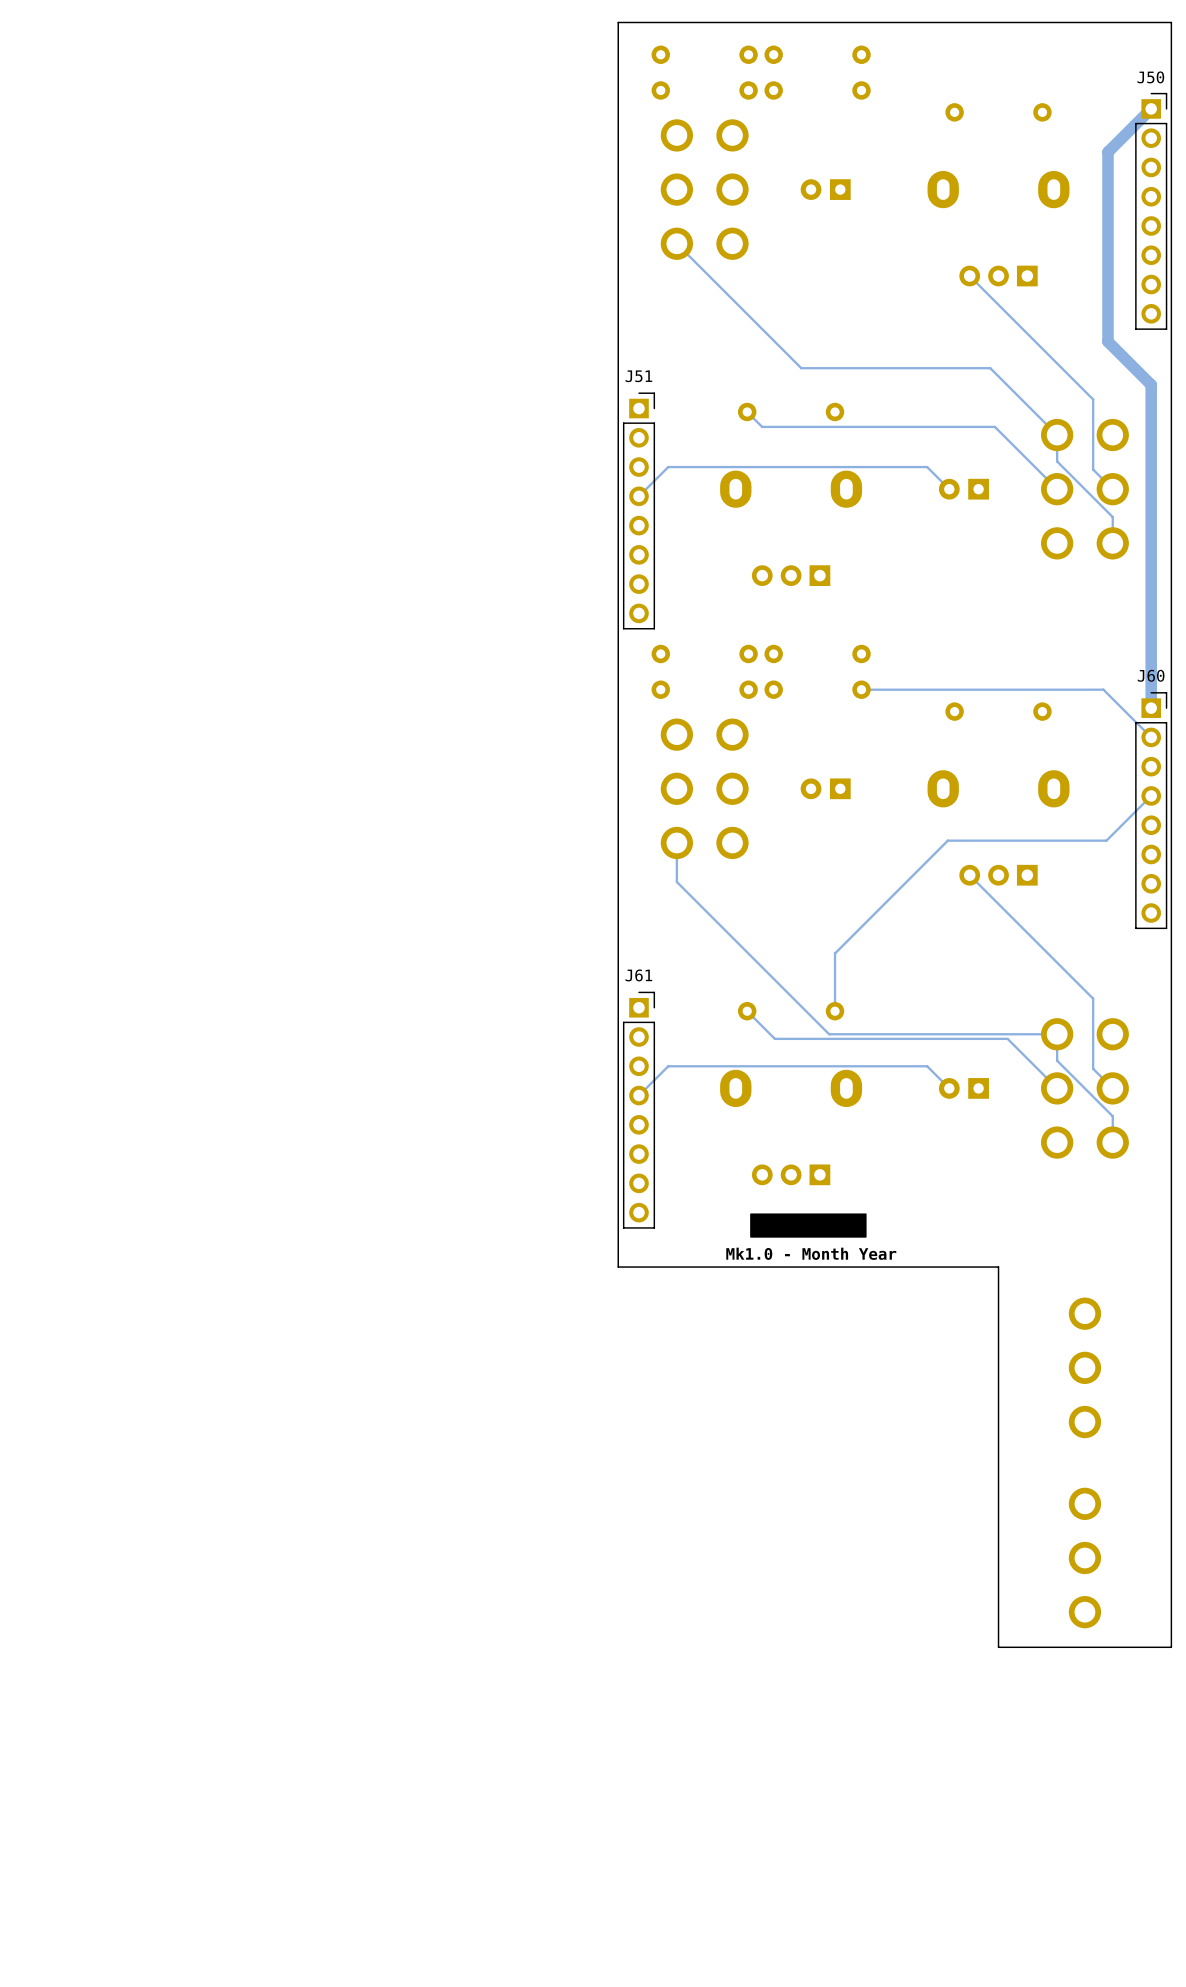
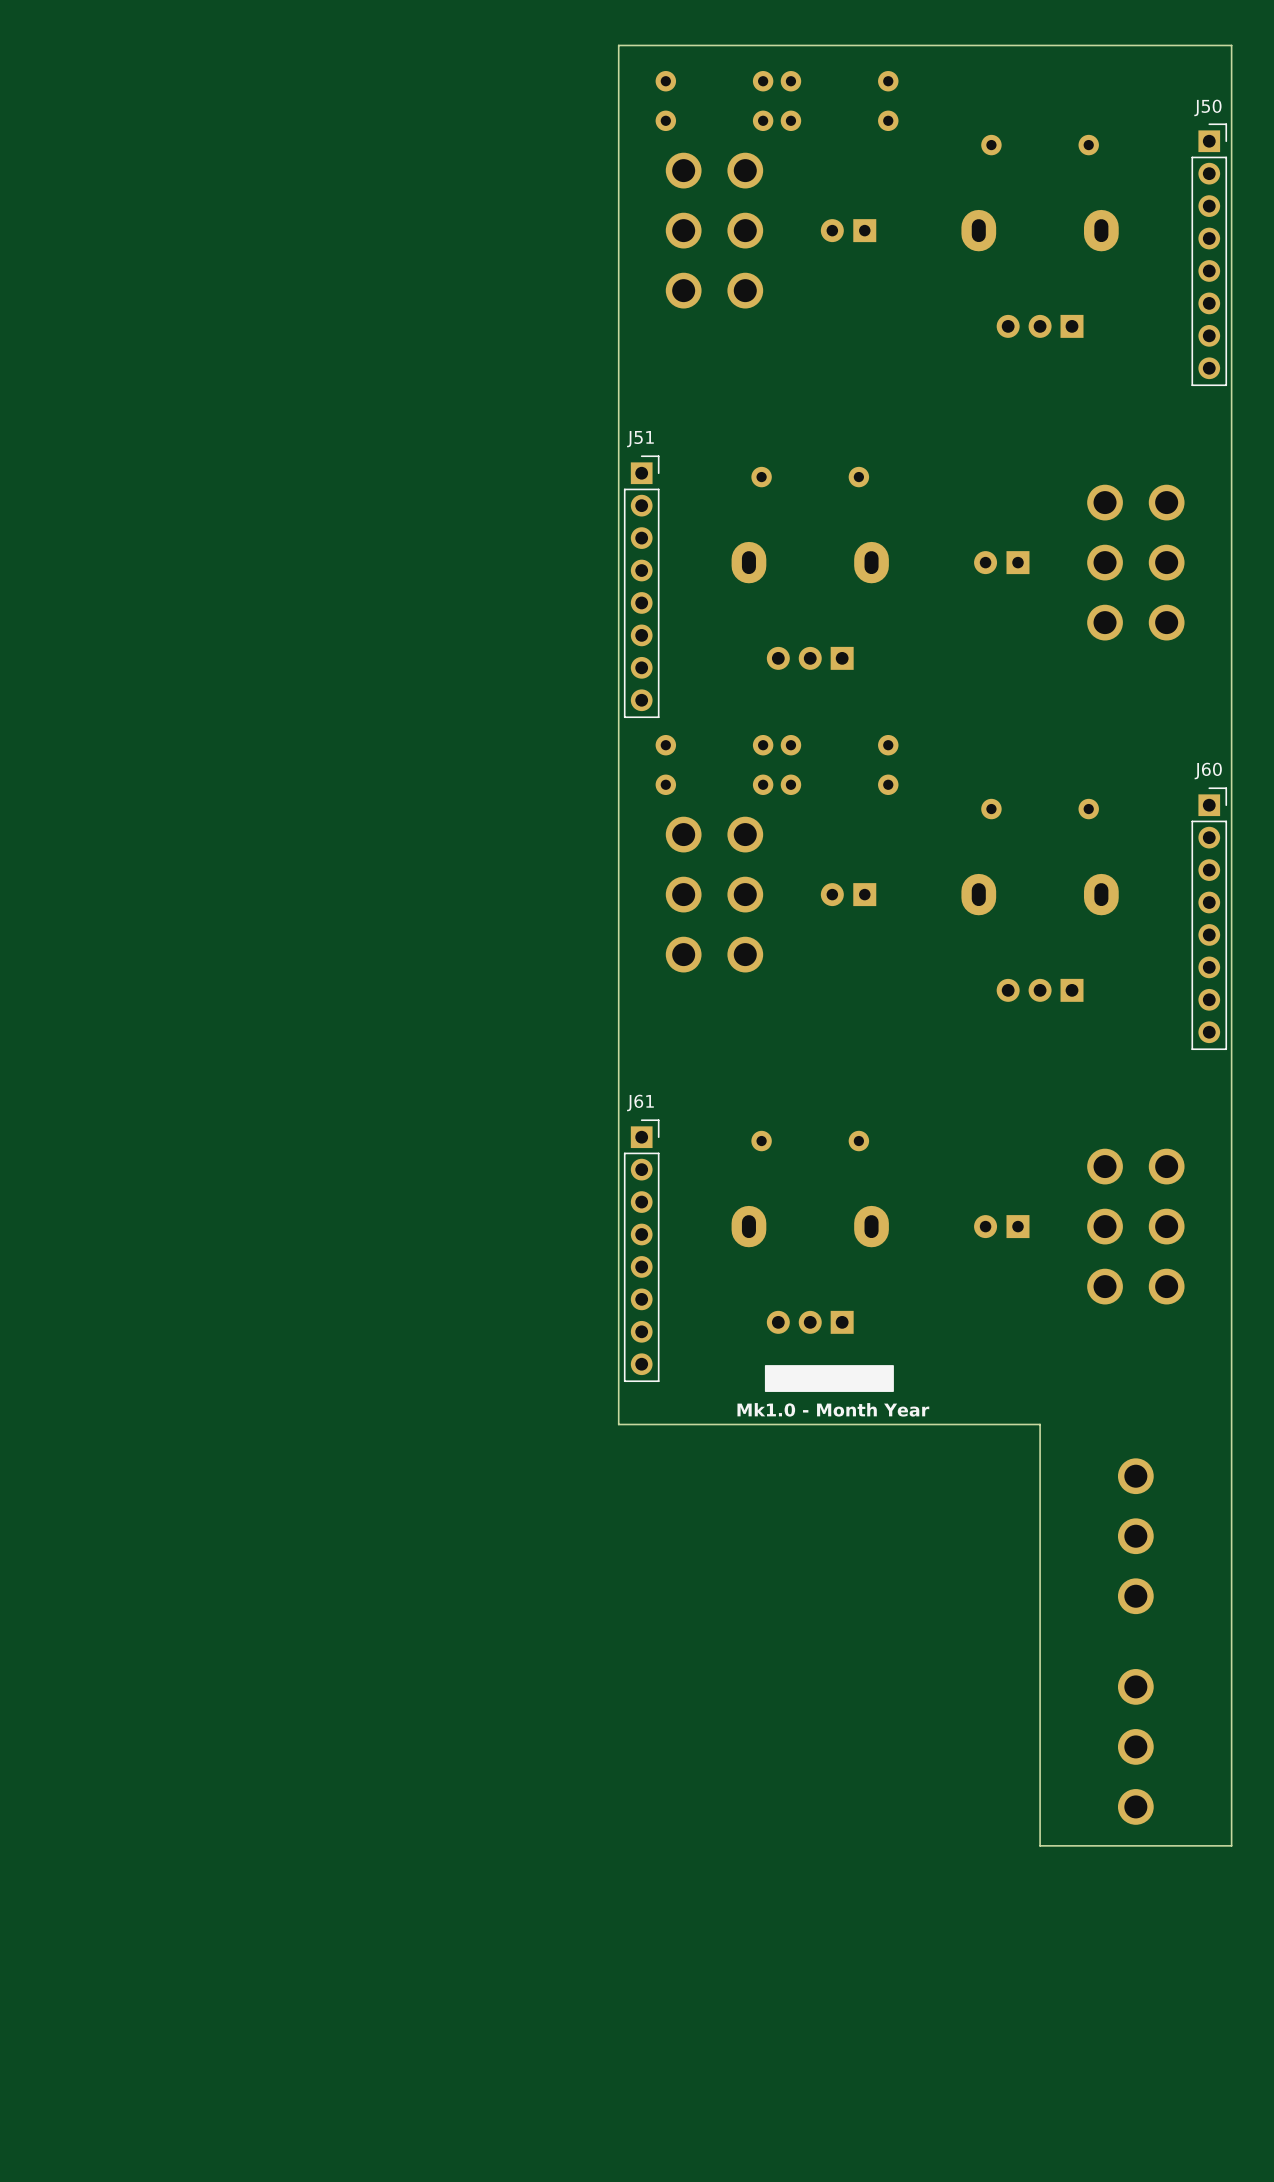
track: (1151, 108) (1108, 152) (1108, 341) (1151, 384) (1151, 708) -> none
track: (676, 243) (801, 368) (990, 368) (1057, 435) (1057, 461) (1112, 517) (1112, 543) -> none
track: (969, 276) (1093, 399) (1093, 469) (1112, 489) -> none
track: (747, 411) (762, 426) (994, 426) (1057, 489) -> none
track: (949, 489) (927, 467) (668, 467) (638, 496) -> none
track: (861, 689) (1103, 689) (1151, 737) -> none
track: (1151, 795) (1106, 840) (947, 840) (835, 953) (835, 1011) -> none
track: (676, 842) (676, 881) (829, 1034) (1057, 1034) (1057, 1060) (1112, 1116) (1112, 1142) -> none
track: (969, 875) (1093, 998) (1093, 1068) (1112, 1088) -> none
track: (747, 1011) (774, 1038) (1007, 1038) (1057, 1088) -> none
track: (949, 1088) (927, 1066) (668, 1066) (638, 1095) -> none

